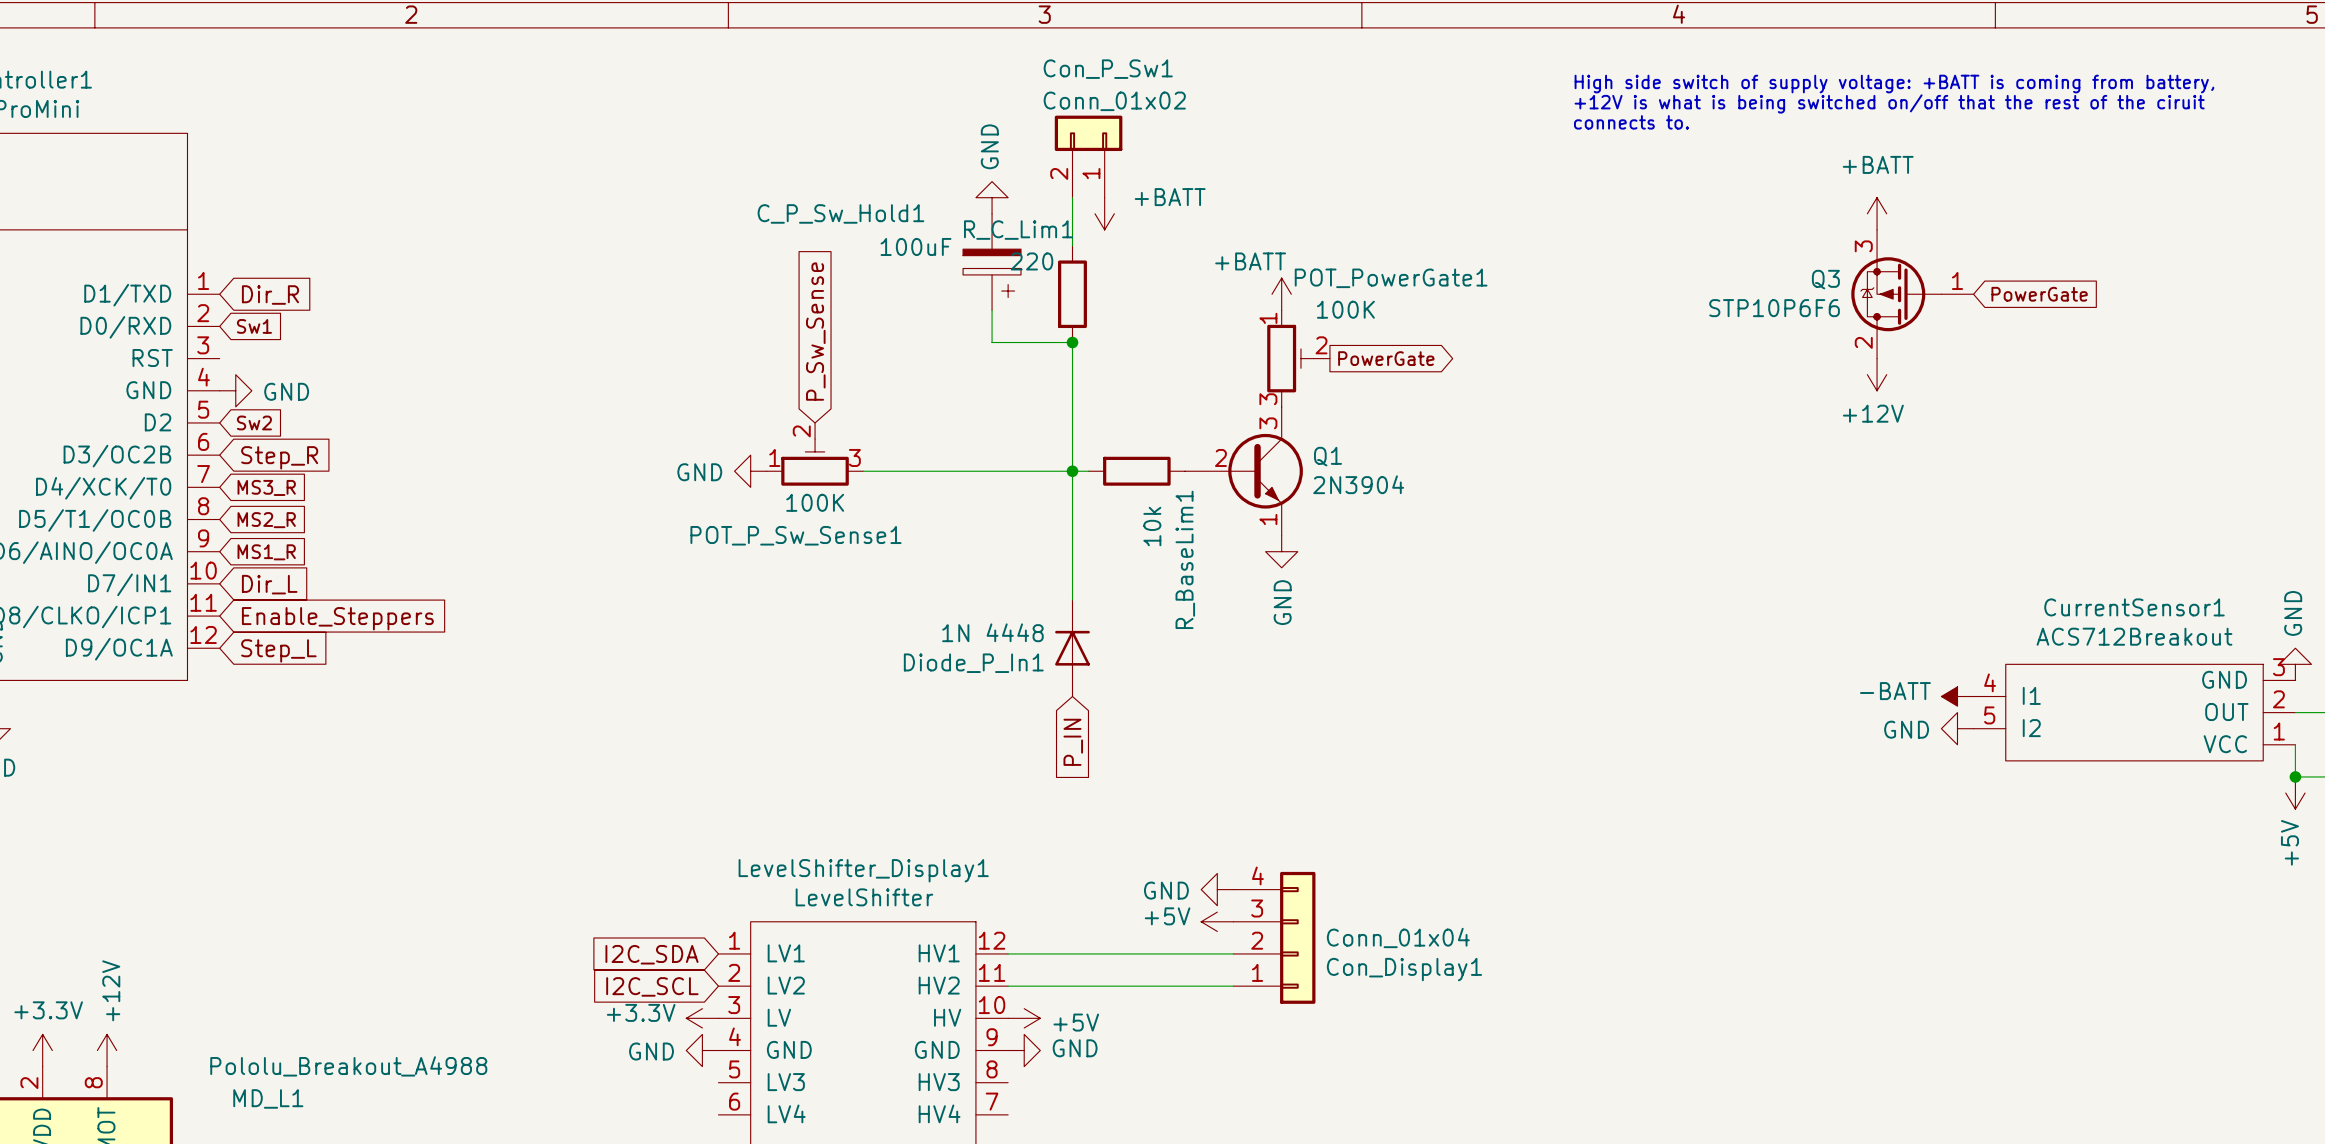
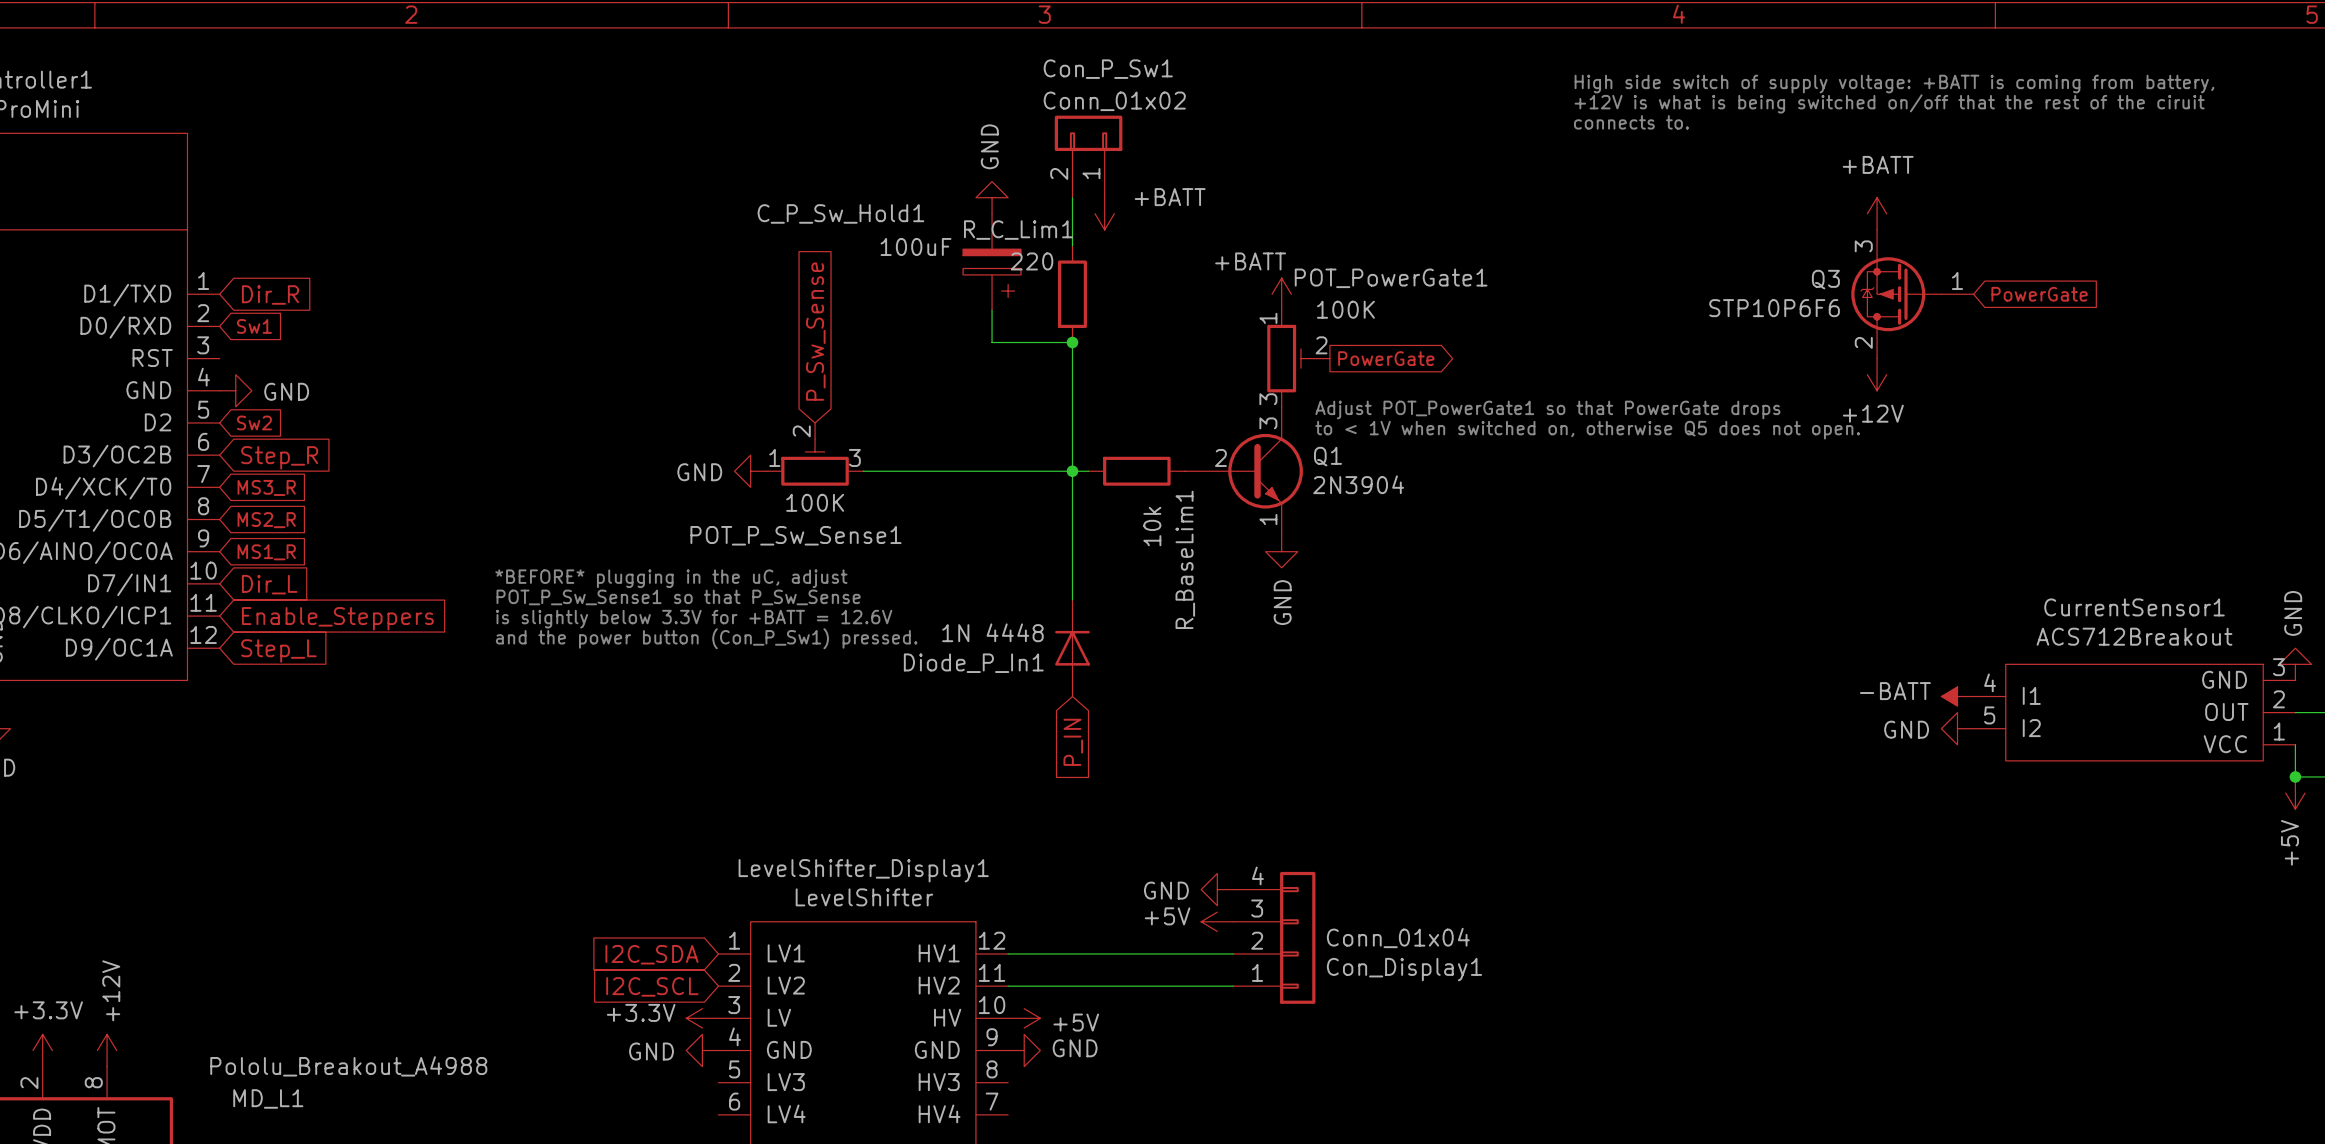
text: none -> Adjust POT_PowerGate1 so that PowerGate drops (1547, 409)
text: none -> to < 1V when switched on, otherwise Q5 does not open. (1587, 430)
text: none -> *BEFORE* plugging in the uC, adjust (671, 578)
text: none -> POT_P_Sw_Sense1 so that P_Sw_Sense (678, 597)
text: none -> is slightly below 3.3V for +BATT = 12.6V (694, 619)
text: none -> and the power button (Con_P_Sw1) pressed. (706, 638)

